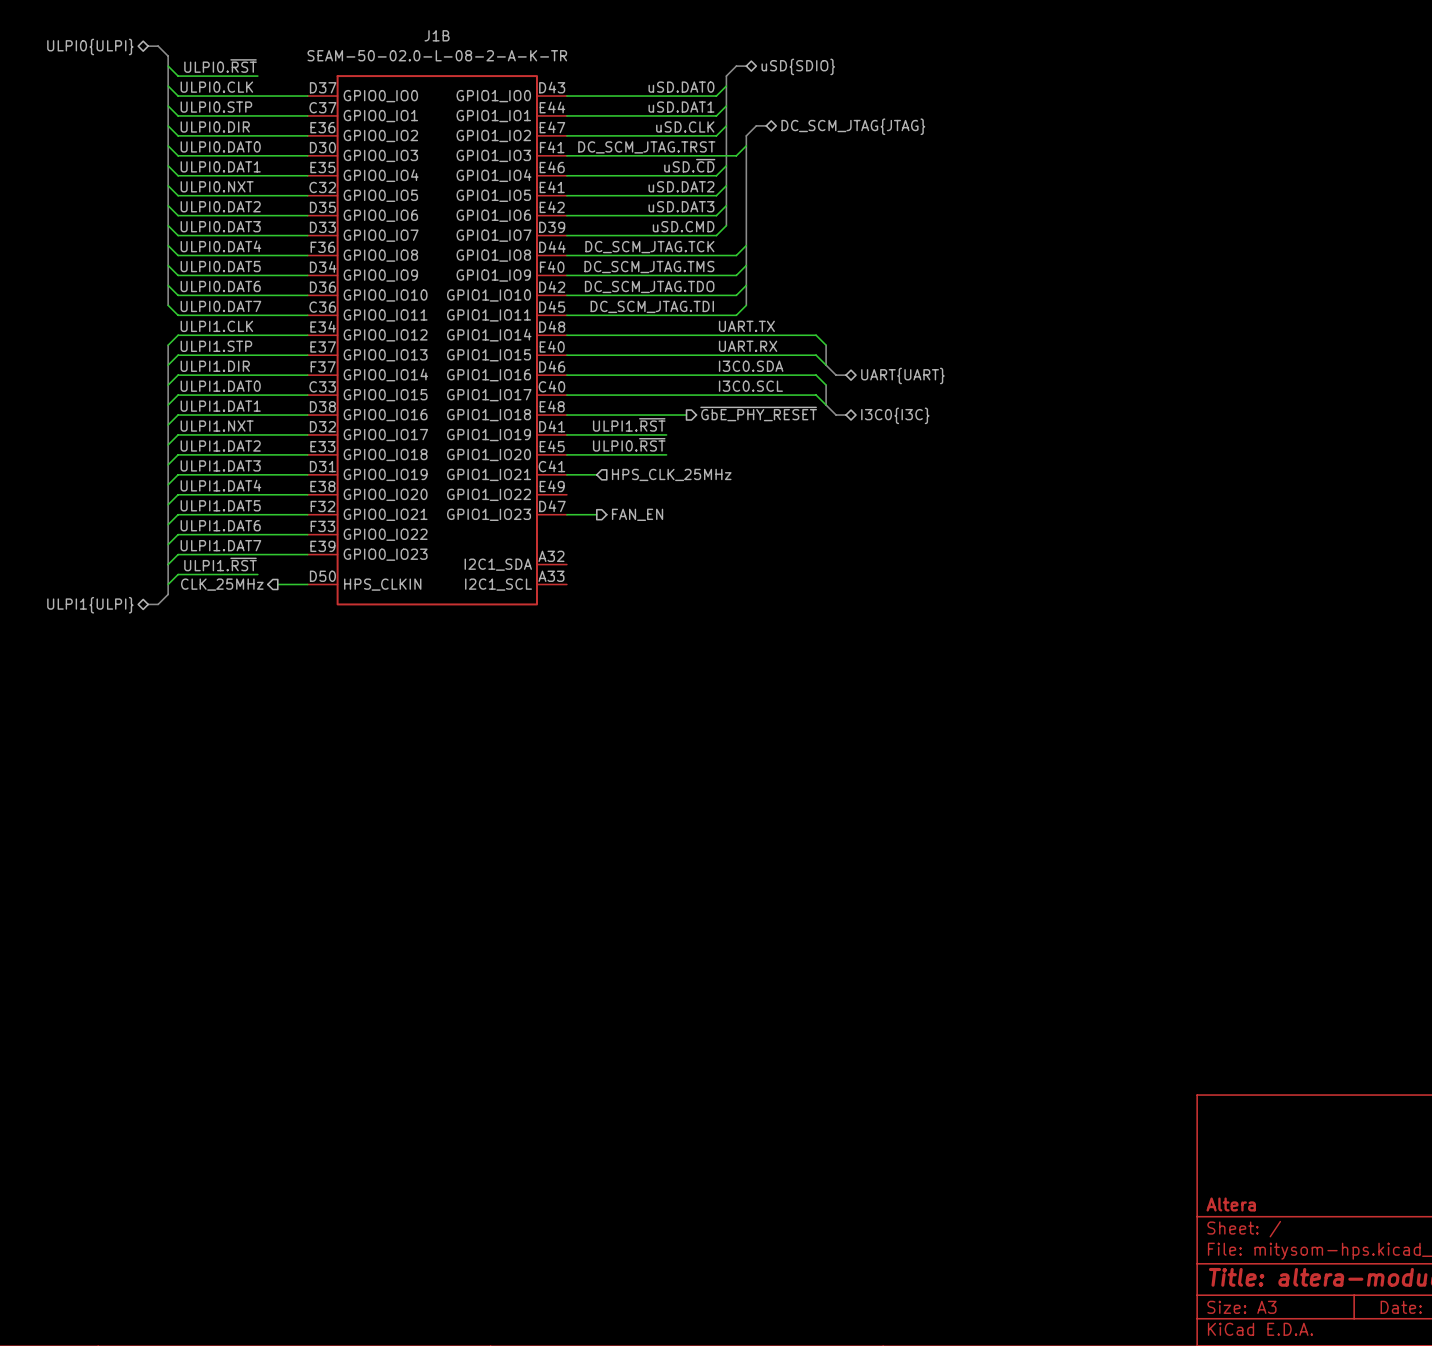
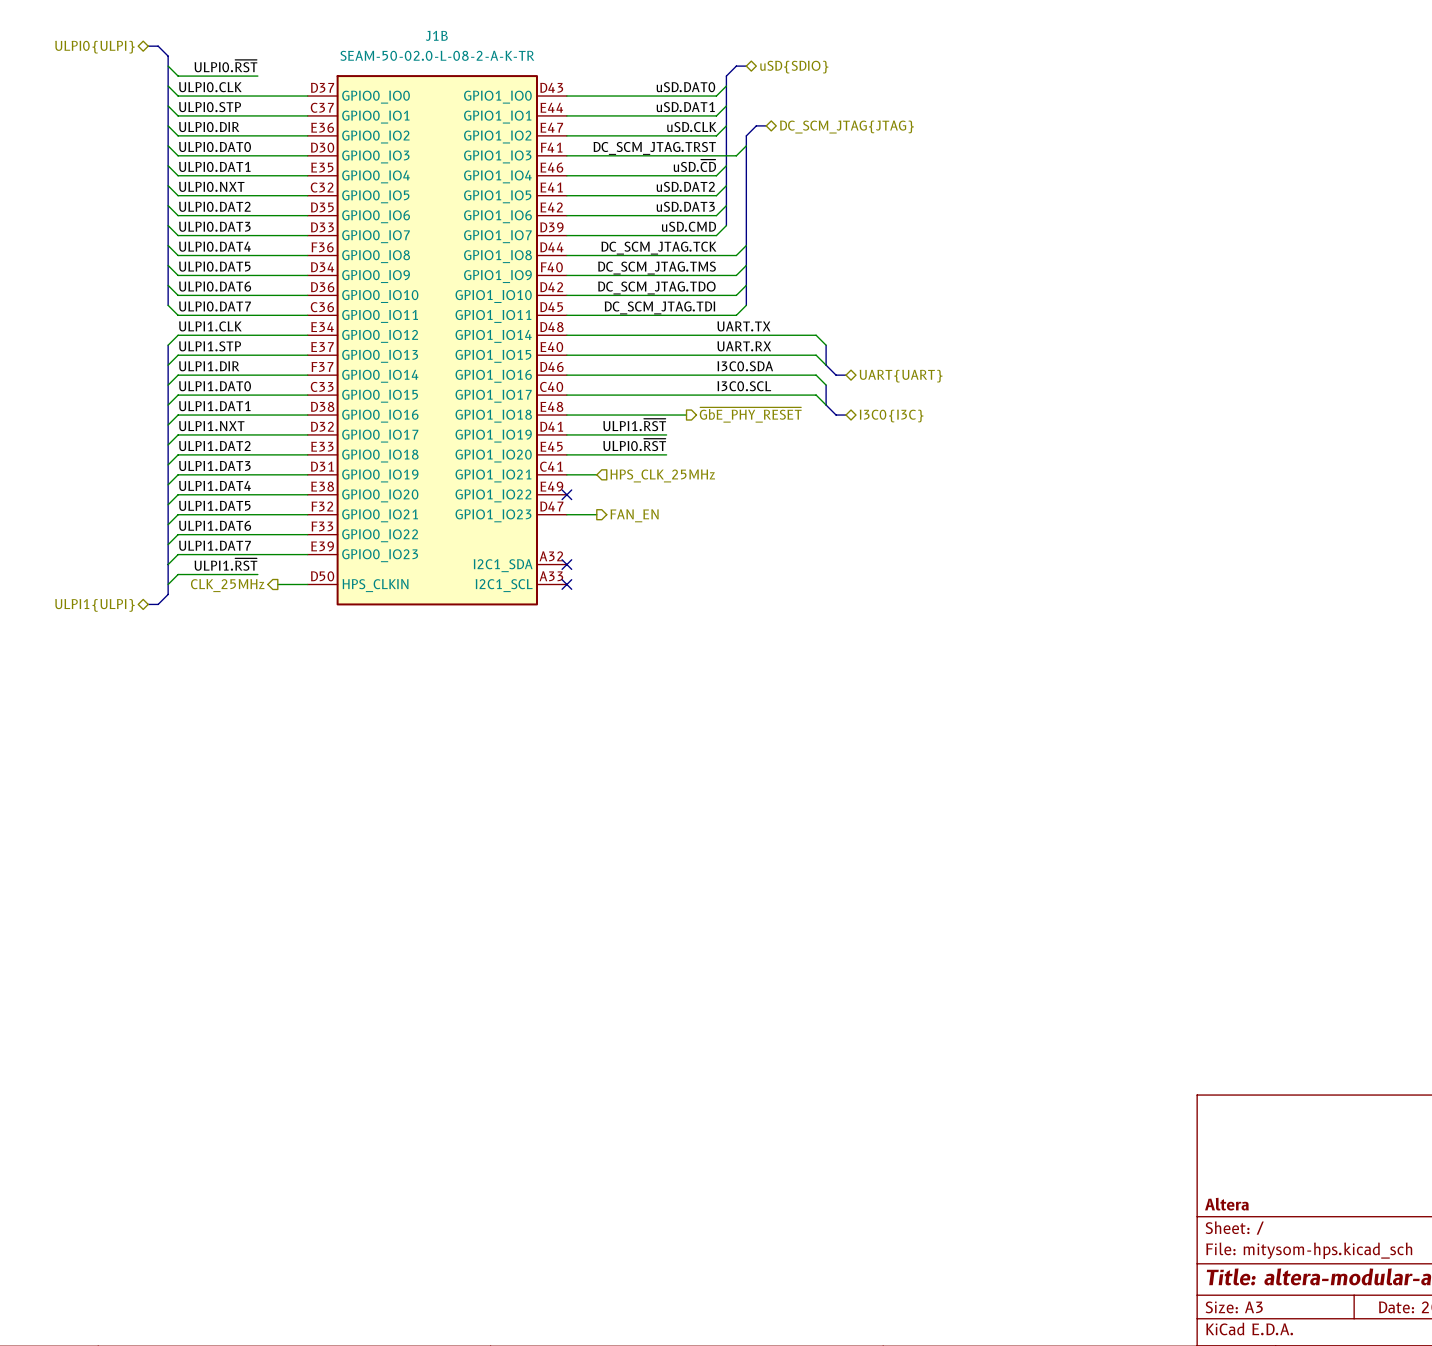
no-connect mark: none -> (566, 494)
no-connect mark: none -> (566, 564)
no-connect mark: none -> (566, 584)

